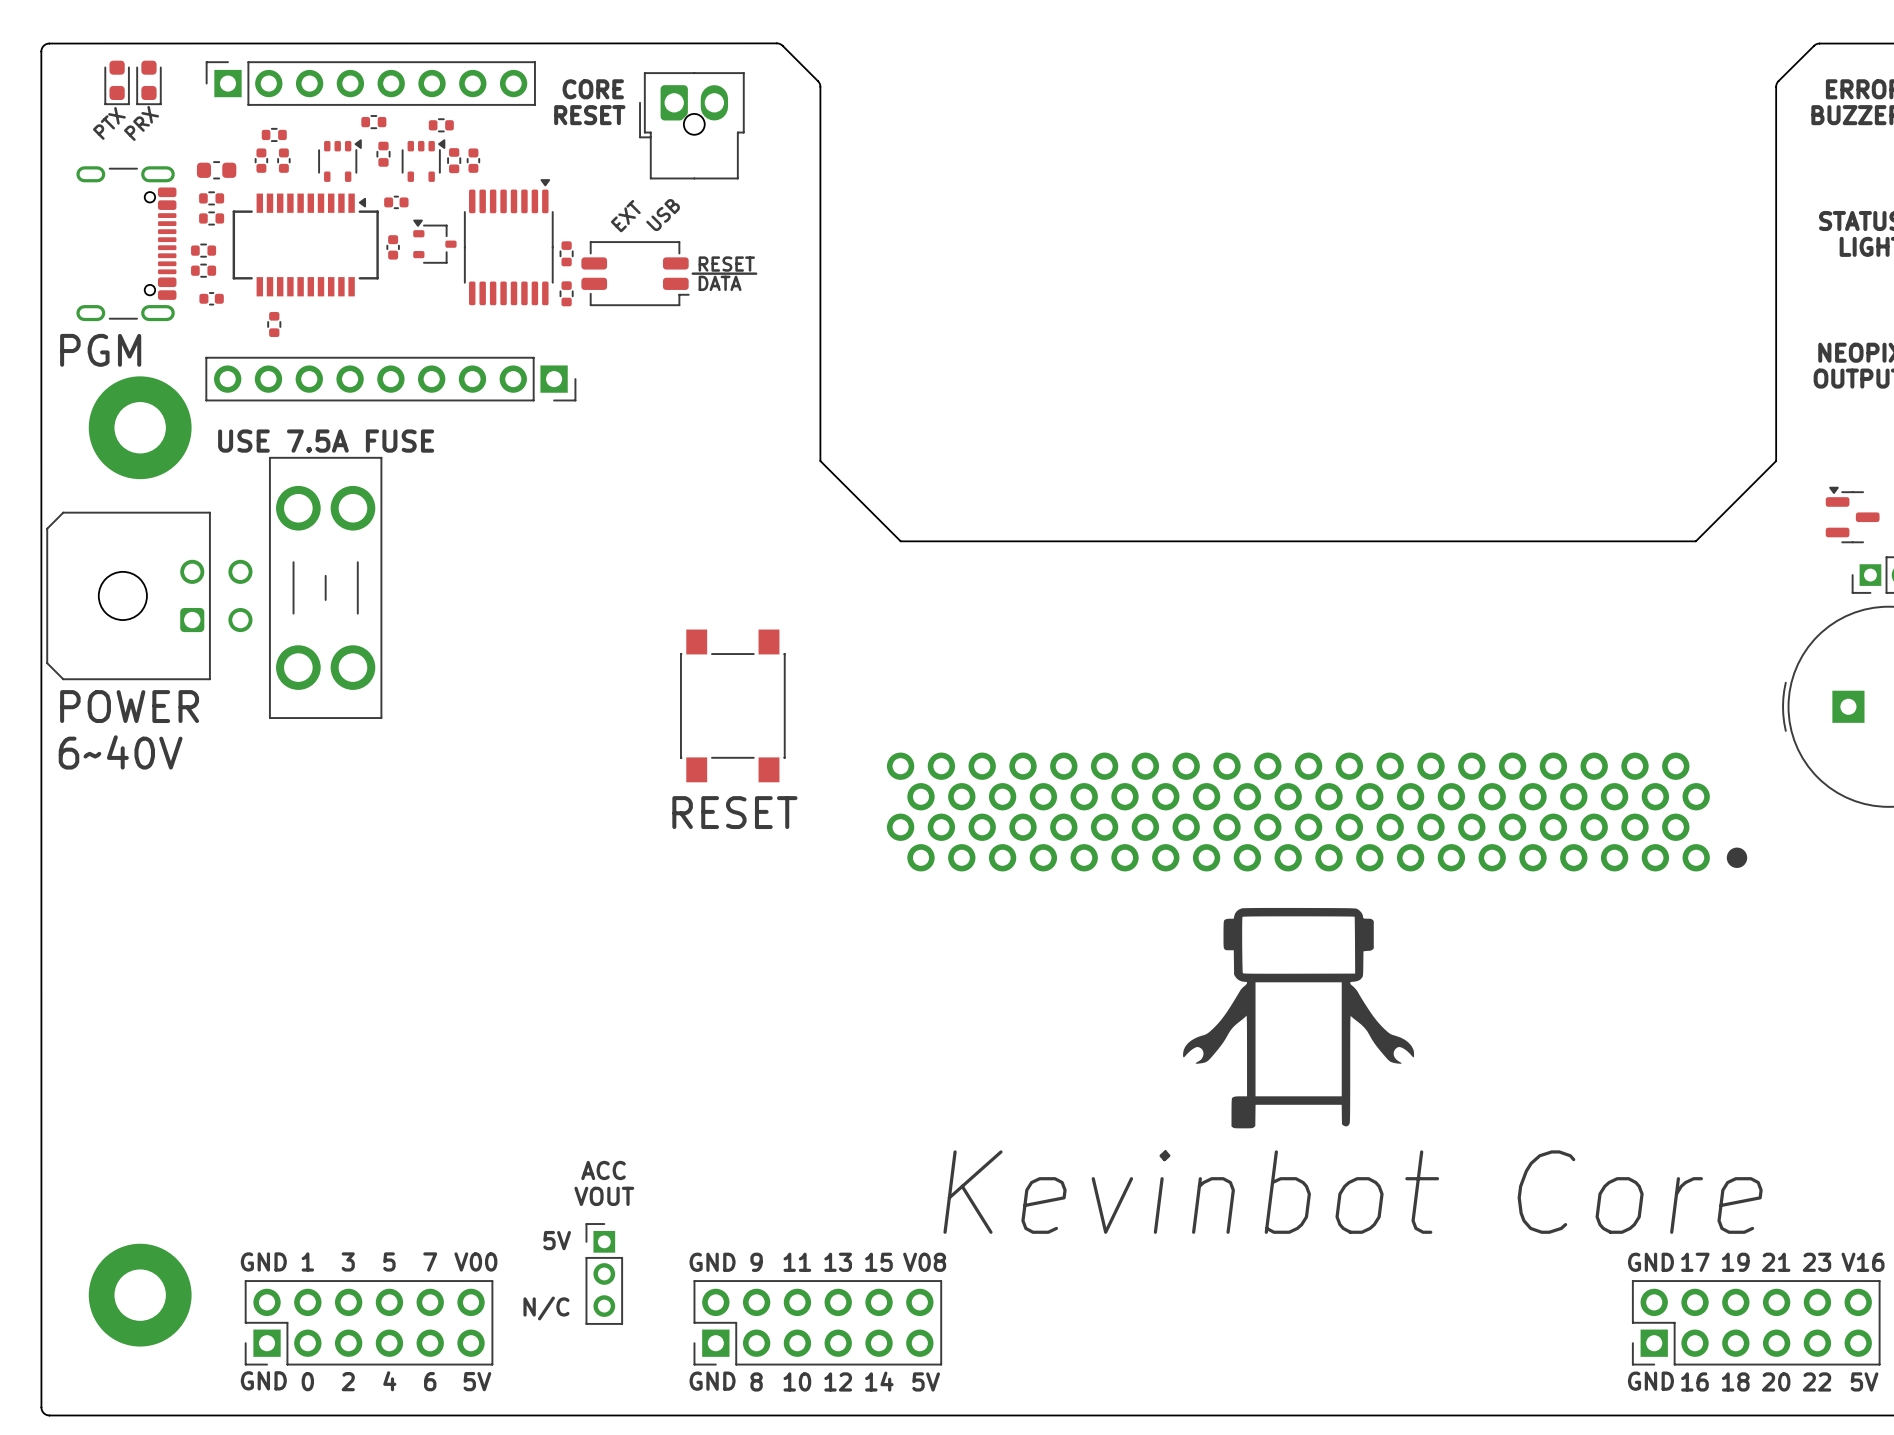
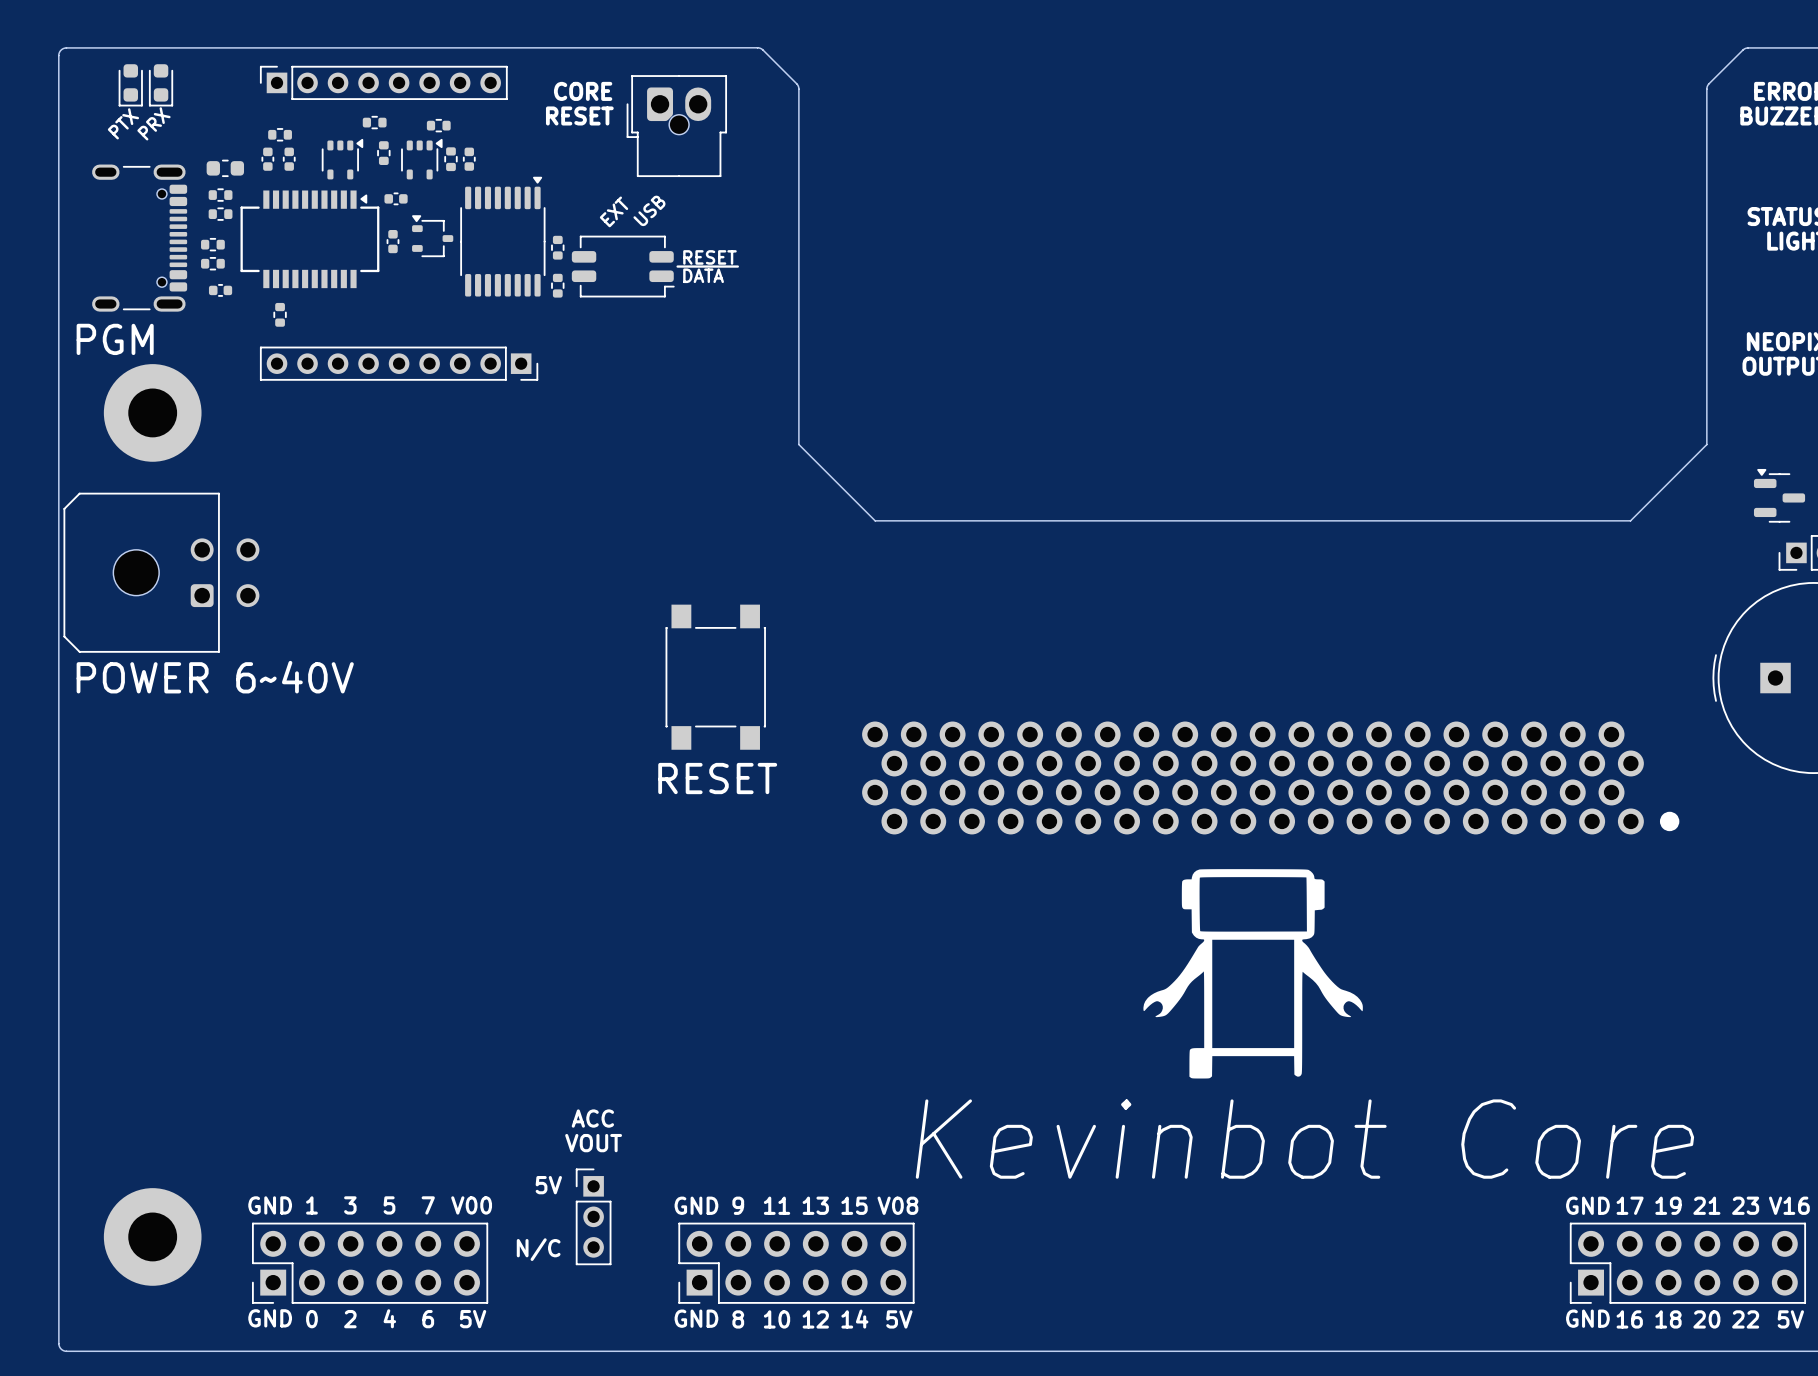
part footprint: [205, 61, 536, 106] -> [259, 65, 508, 100]
part footprint: [205, 356, 577, 402] -> [259, 346, 539, 381]
text: USE 7.5A FUSE (326, 441) -> none
part: (325, 587) -> none
text: POWER (129, 706) -> POWER 6~40V (215, 677)
text: 6~40V (120, 752) -> none

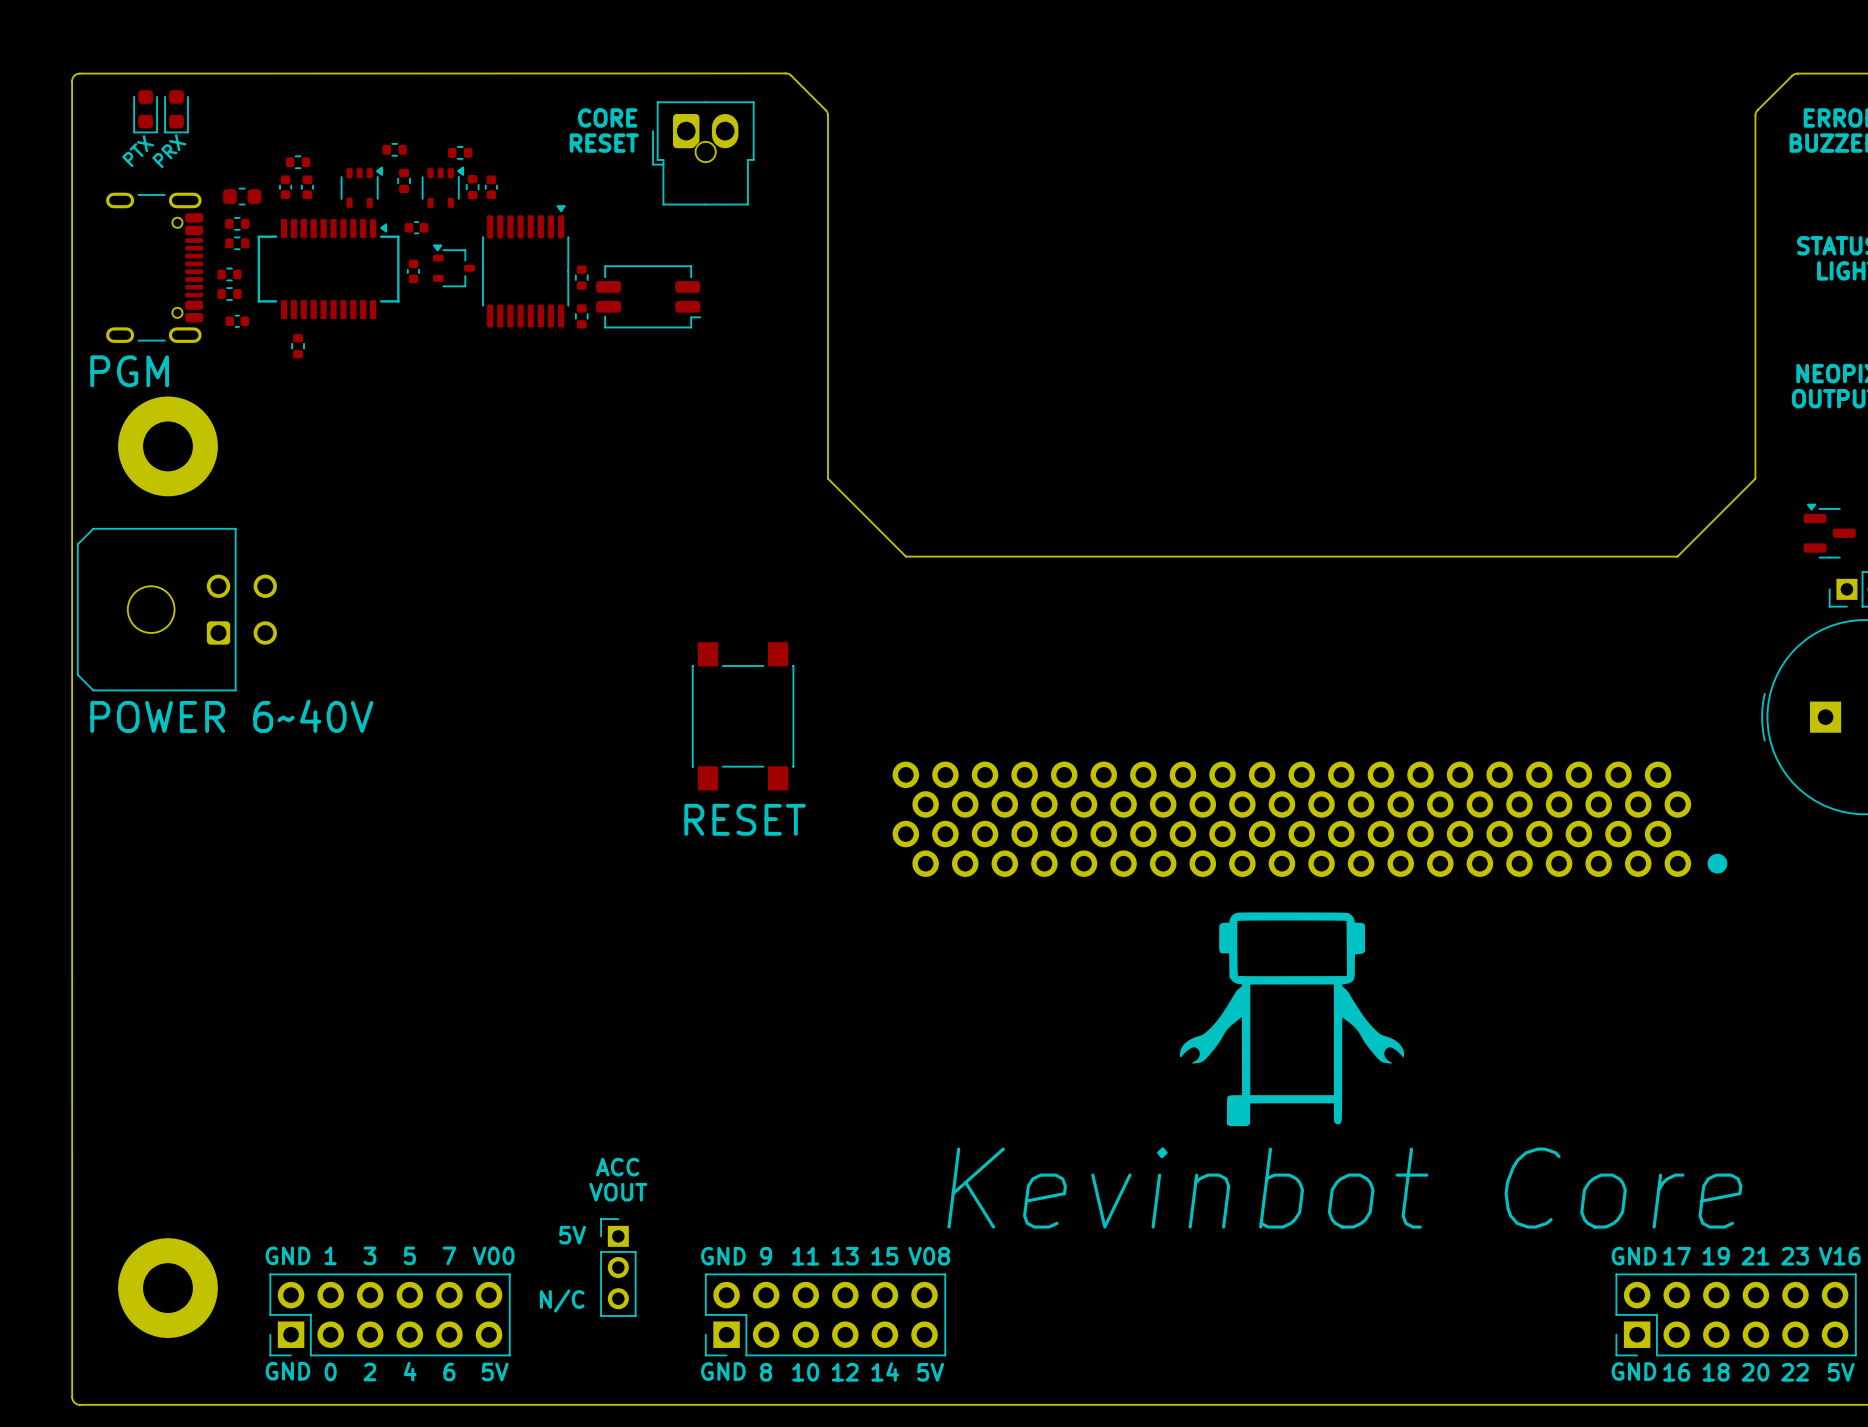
part: (383, 82) -> none
text: USB (649, 210) -> none
text: EXT (614, 211) -> none
text: RESET (709, 257) -> none
line: (677, 266) (737, 266) -> none
text: DATA (703, 275) -> none
part: (399, 363) -> none

